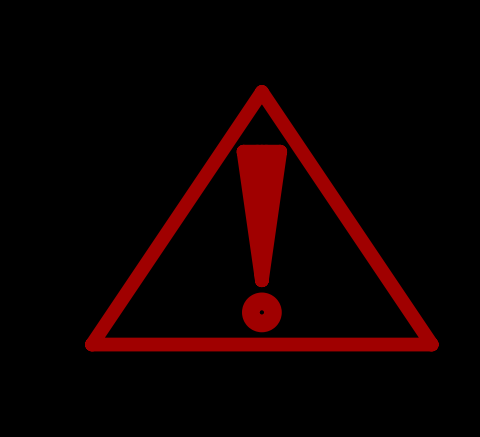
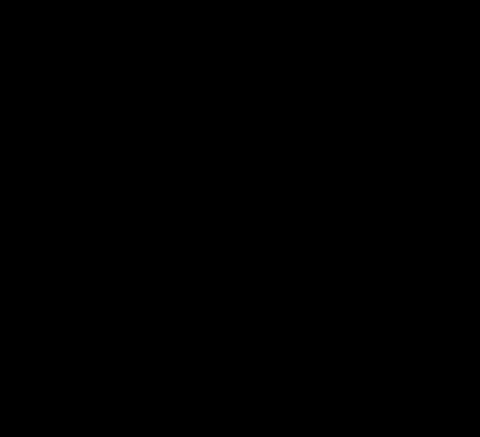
drawing: [85, 85, 439, 352] -> none

